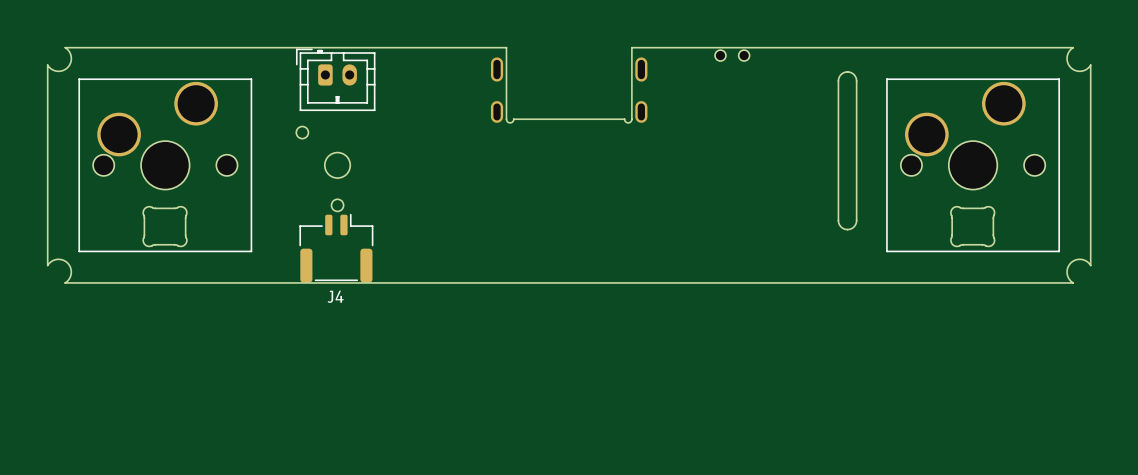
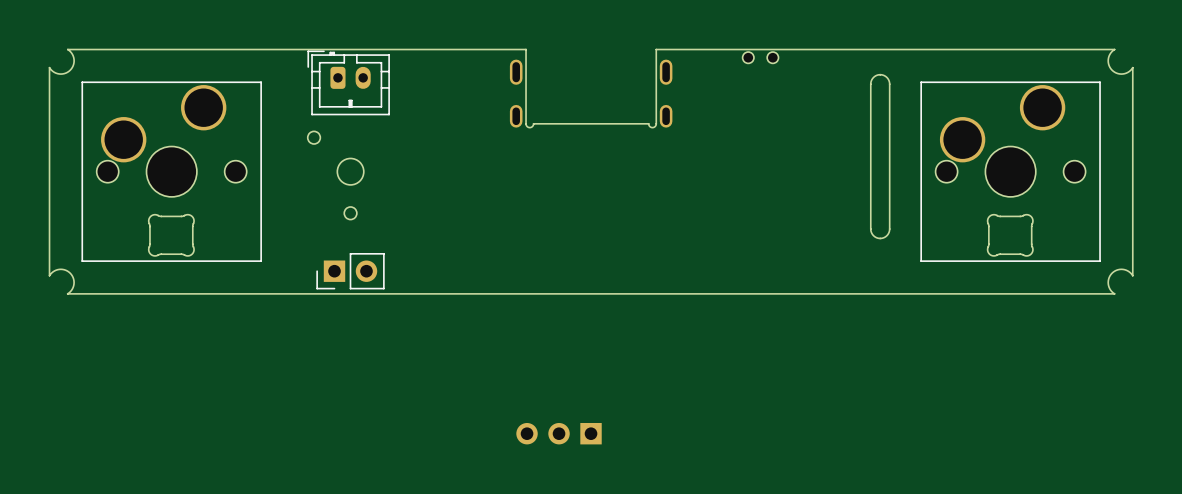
J4: (336, 248) -> none
part: none -> (350, 271)
part: none -> (559, 433)

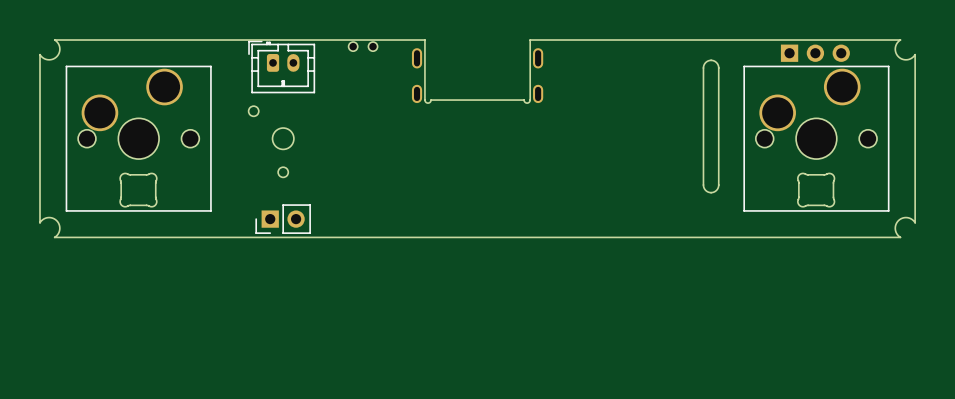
part position: (760, 57) -> (363, 46)
part: none -> (815, 53)
part: (559, 433) -> none

